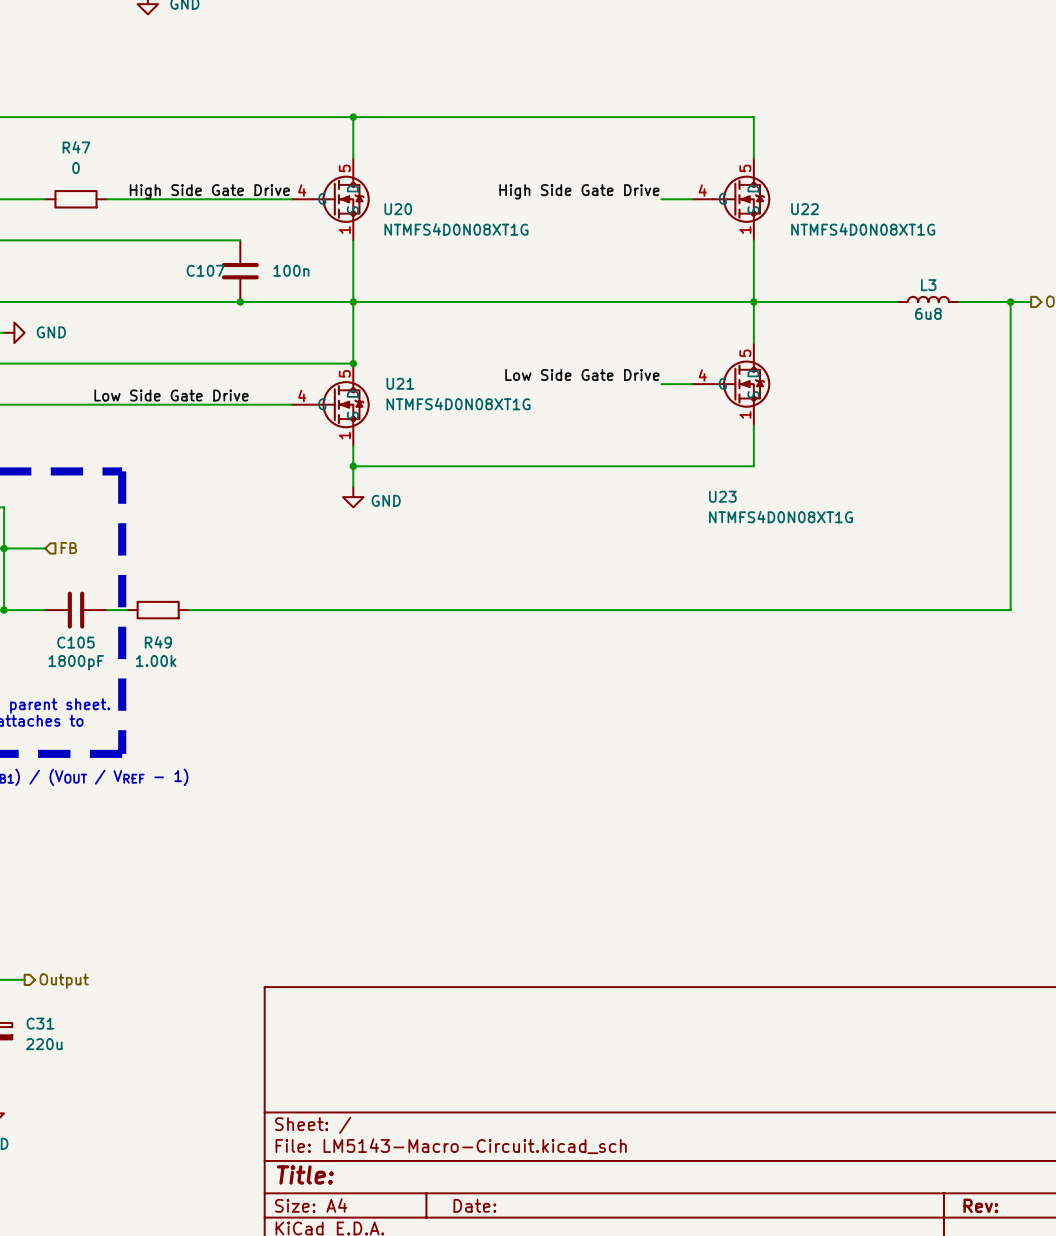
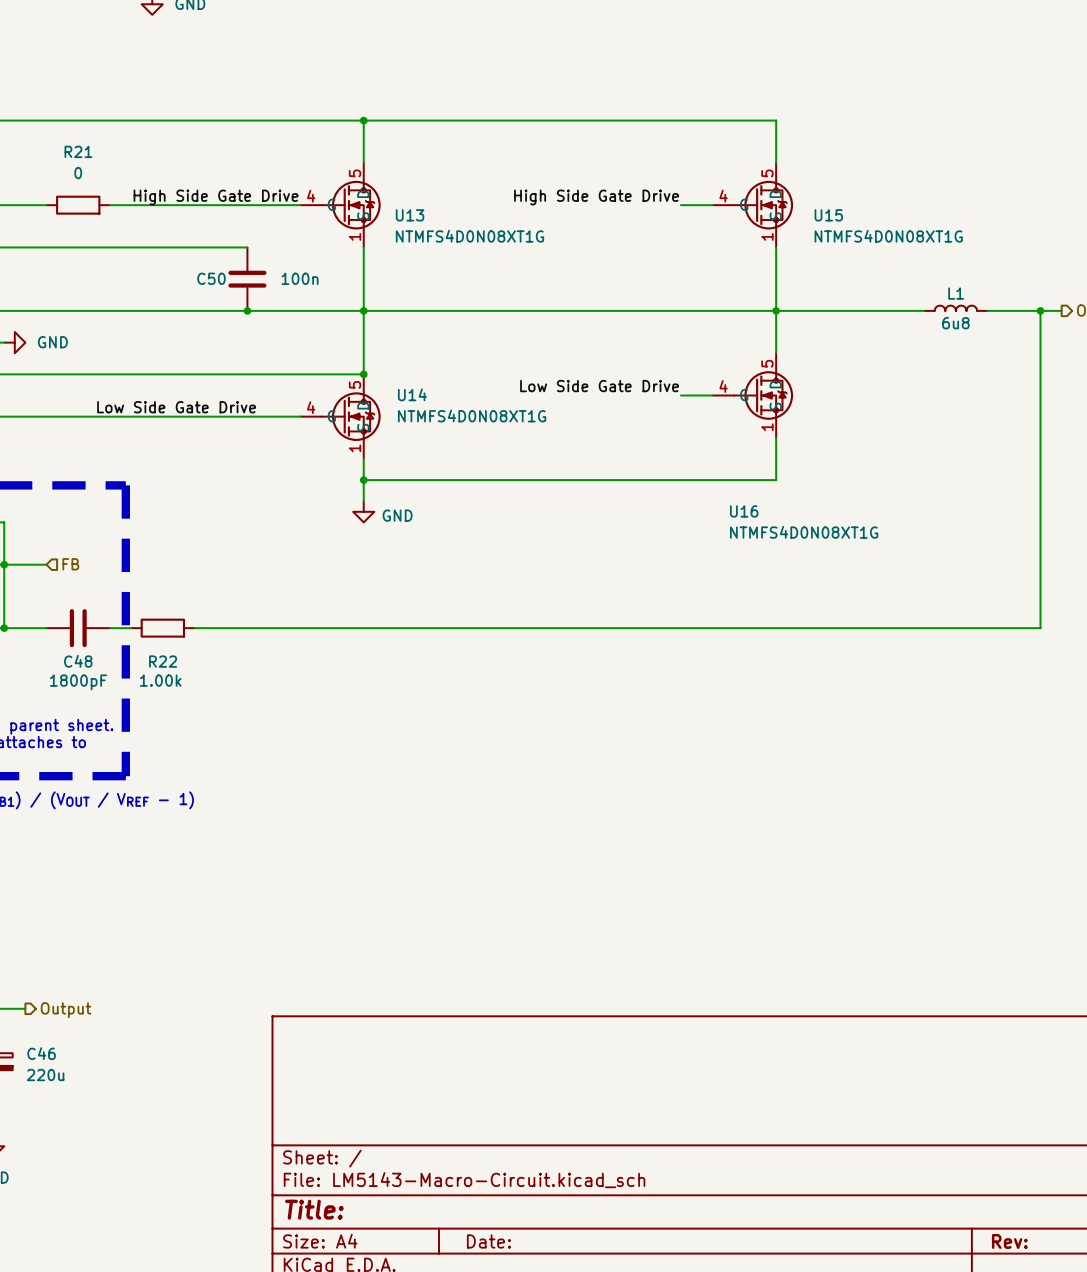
R47 name: R47 (76, 147) -> R21 (78, 151)
U20 name: U20 (398, 209) -> U13 (410, 215)
U22 name: U22 (804, 209) -> U15 (828, 215)
C107 name: C107 (205, 270) -> C50 (211, 278)
L3 name: L3 (928, 285) -> L1 (956, 293)
U21 name: U21 (400, 383) -> U14 (412, 394)
U23 name: U23 (722, 496) -> U16 (744, 511)
C105 name: C105 (76, 642) -> C48 (78, 661)
R49 name: R49 (158, 642) -> R22 (163, 661)
C31 name: C31 (40, 1023) -> C46 (41, 1053)

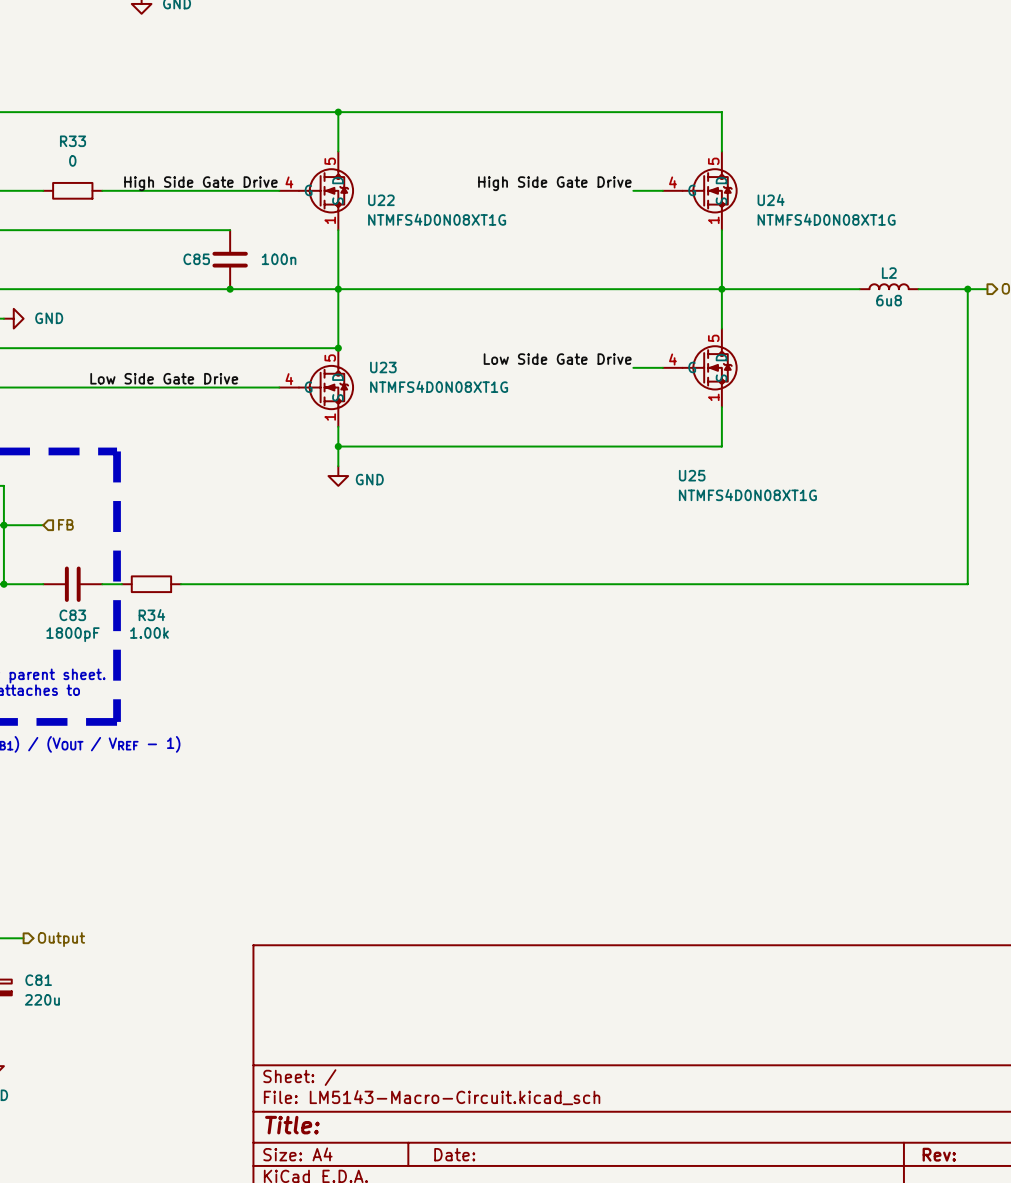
R21 name: R21 (78, 151) -> R33 (73, 141)
U13 name: U13 (410, 215) -> U22 (381, 200)
U15 name: U15 (828, 215) -> U24 (771, 200)
C50 name: C50 (211, 278) -> C85 (196, 259)
L1 name: L1 (956, 293) -> L2 (889, 273)
U14 name: U14 (412, 394) -> U23 (383, 367)
U16 name: U16 (744, 511) -> U25 (692, 475)
C48 name: C48 (78, 661) -> C83 (72, 615)
R22 name: R22 (163, 661) -> R34 (151, 615)
C46 name: C46 (41, 1053) -> C81 (38, 980)

